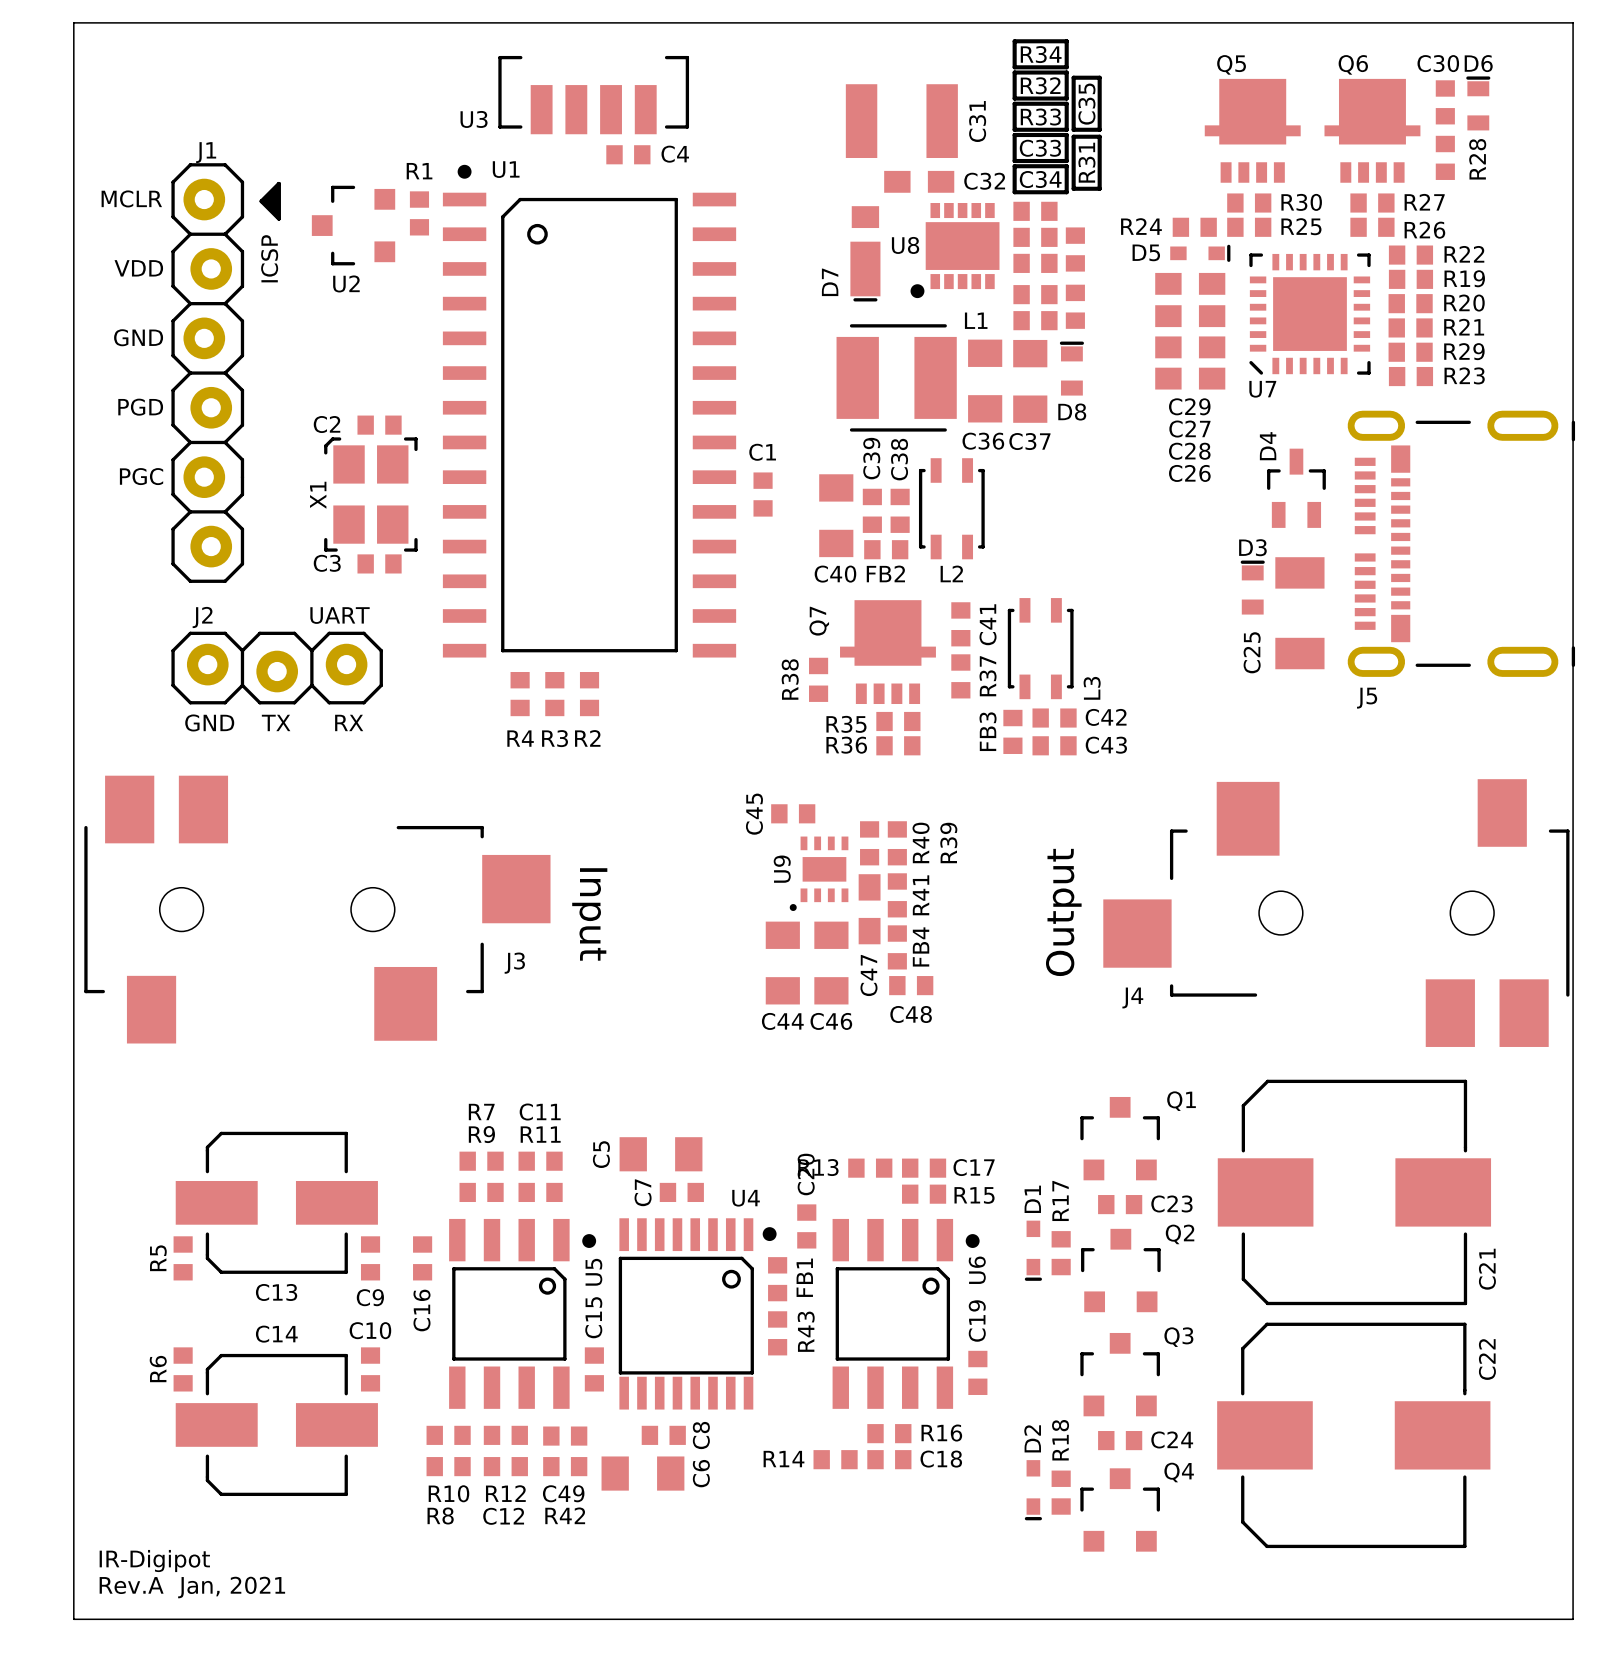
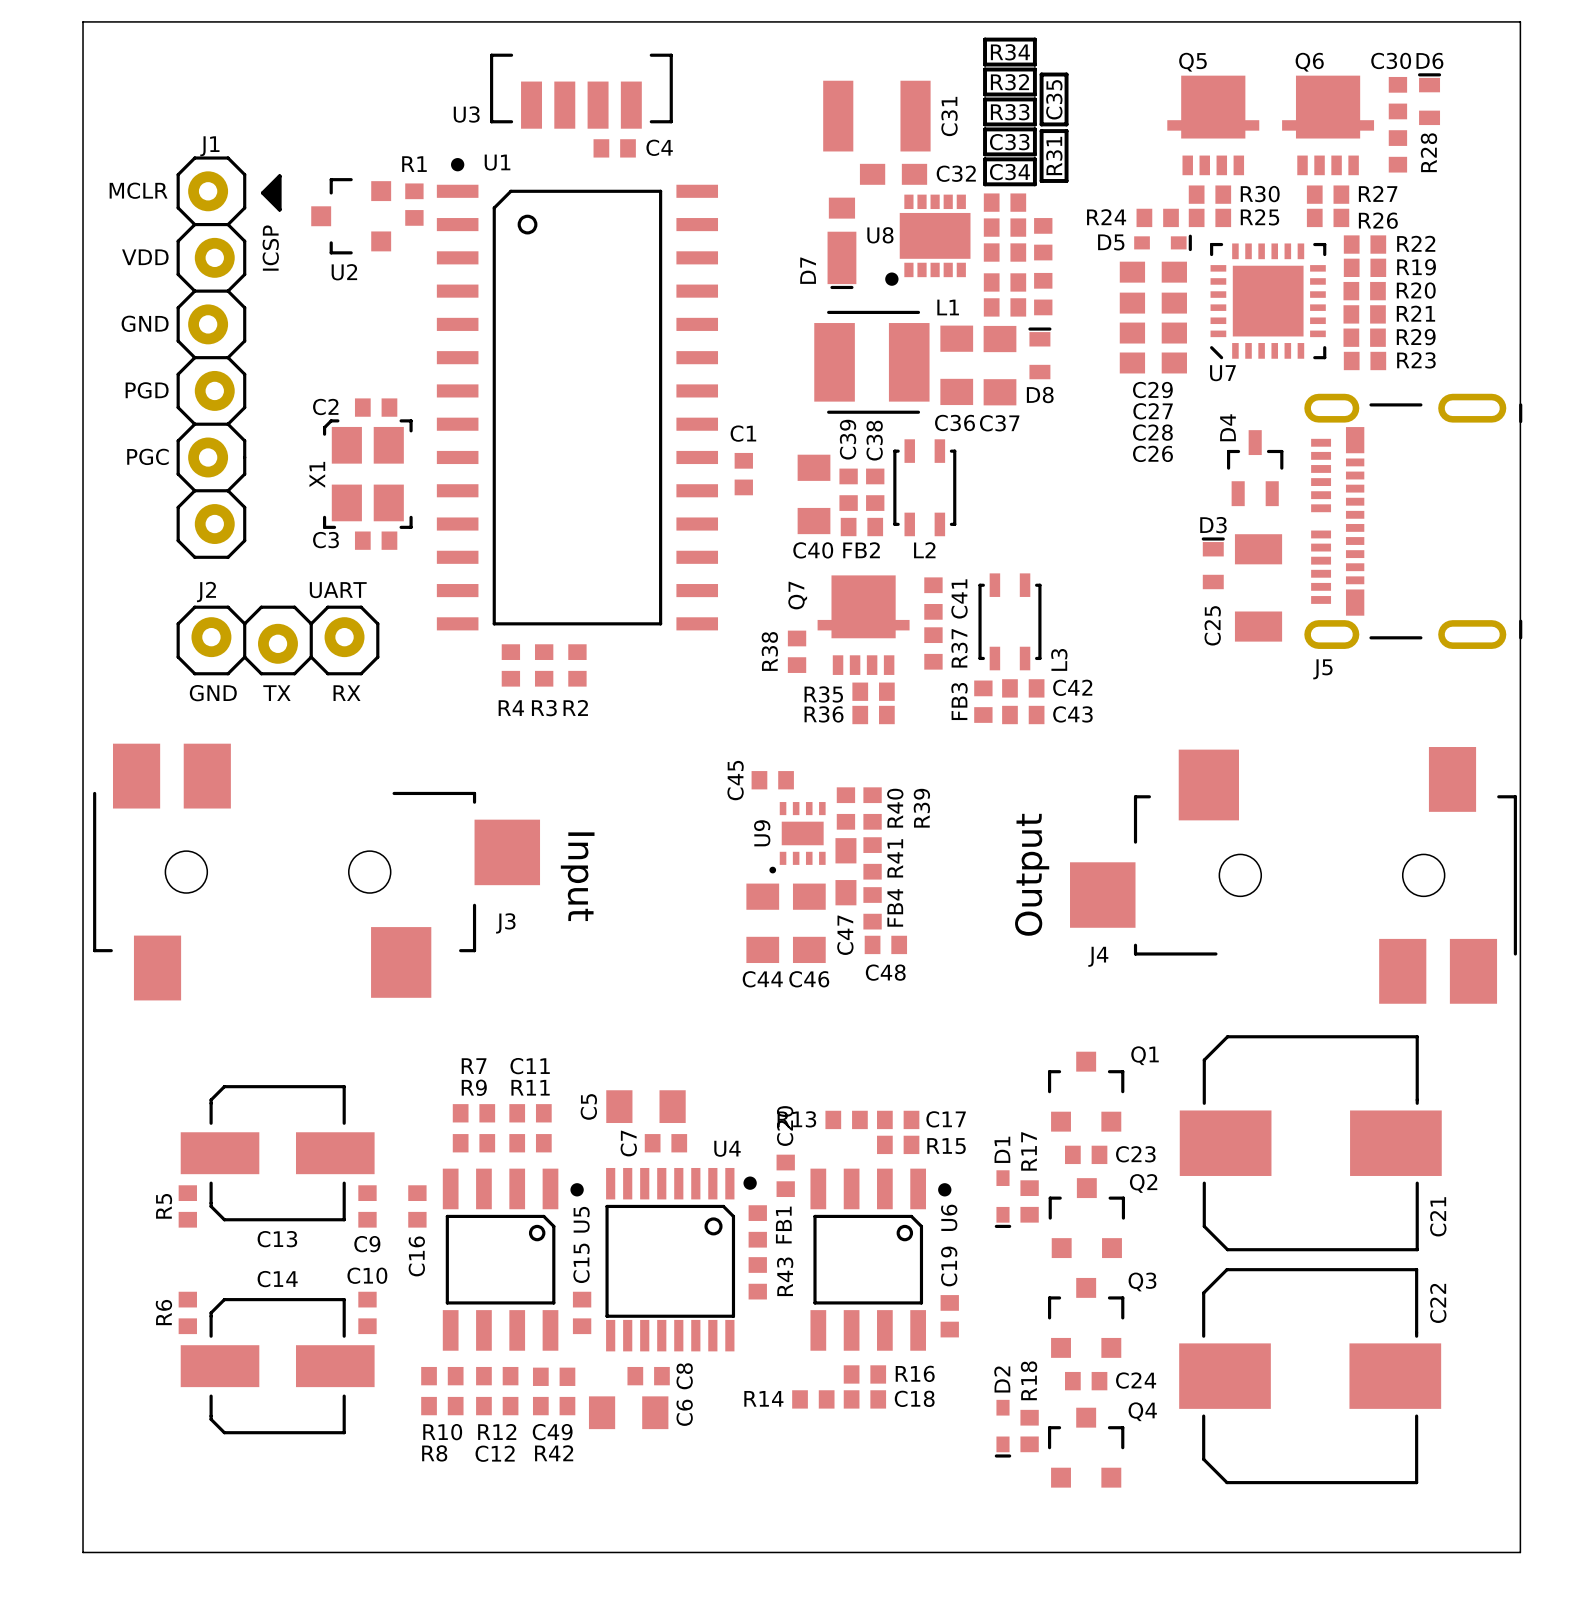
text: IR-Digipot (154, 1561) -> none
text: Rev.A (131, 1585) -> none
text: Jan, 2021 (231, 1587) -> none

